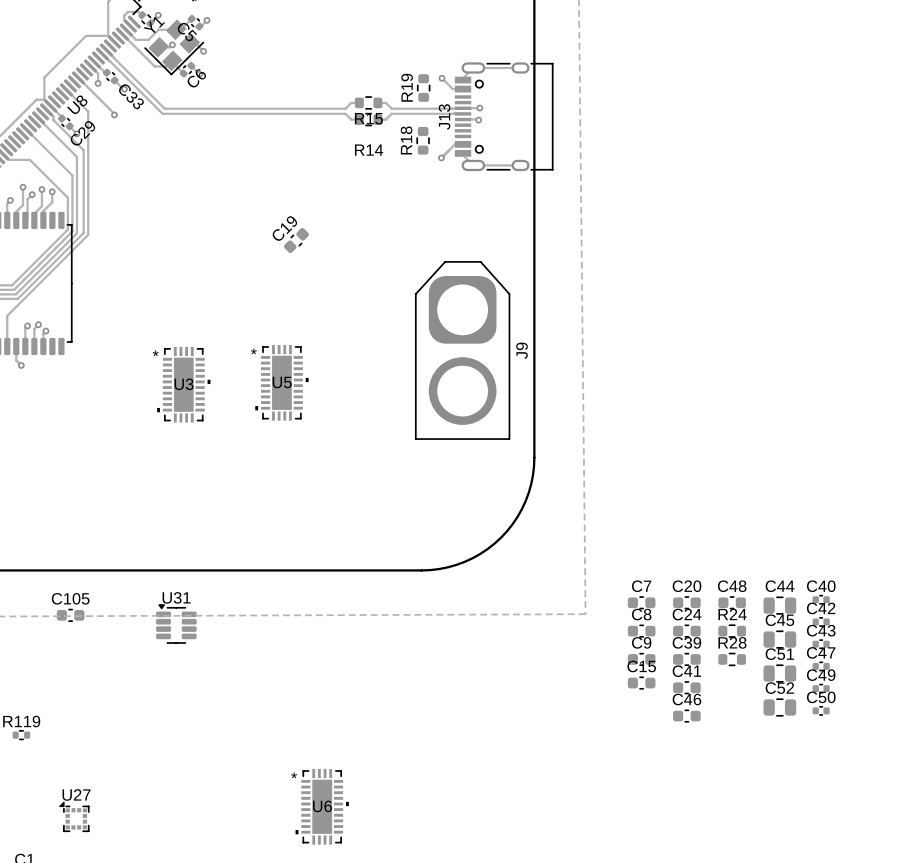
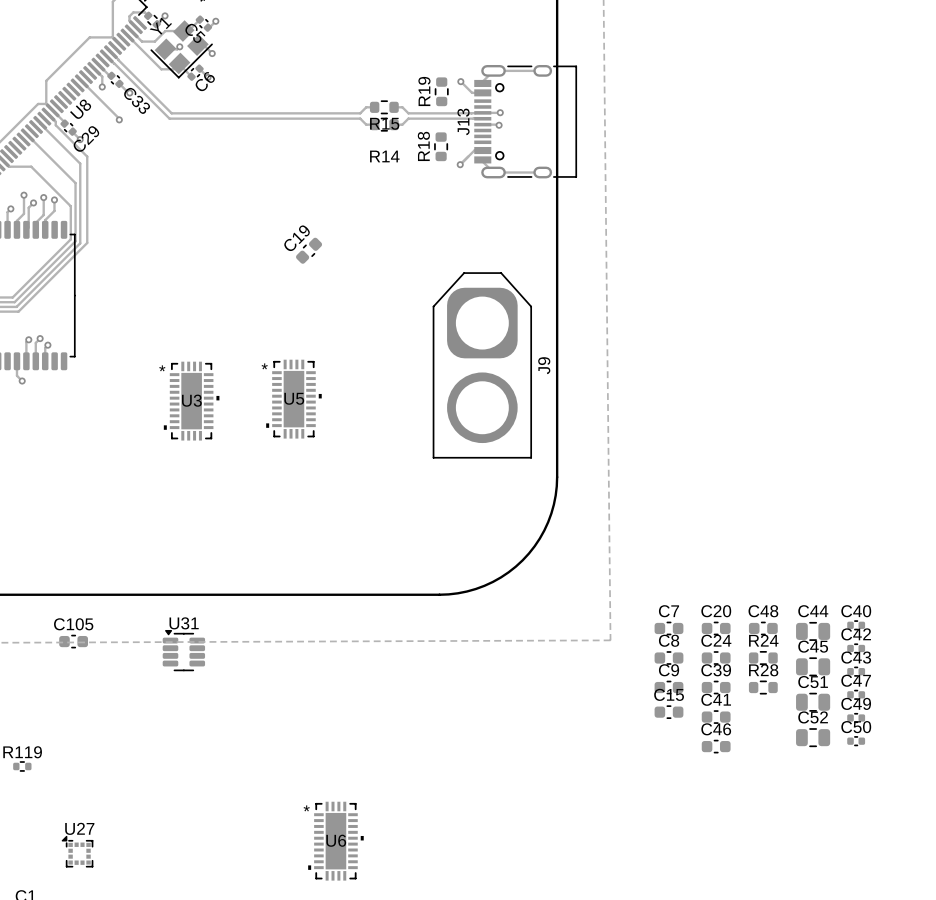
track: (66, 89) (88, 111) (88, 234) (7, 315) (7, 346) -> none

